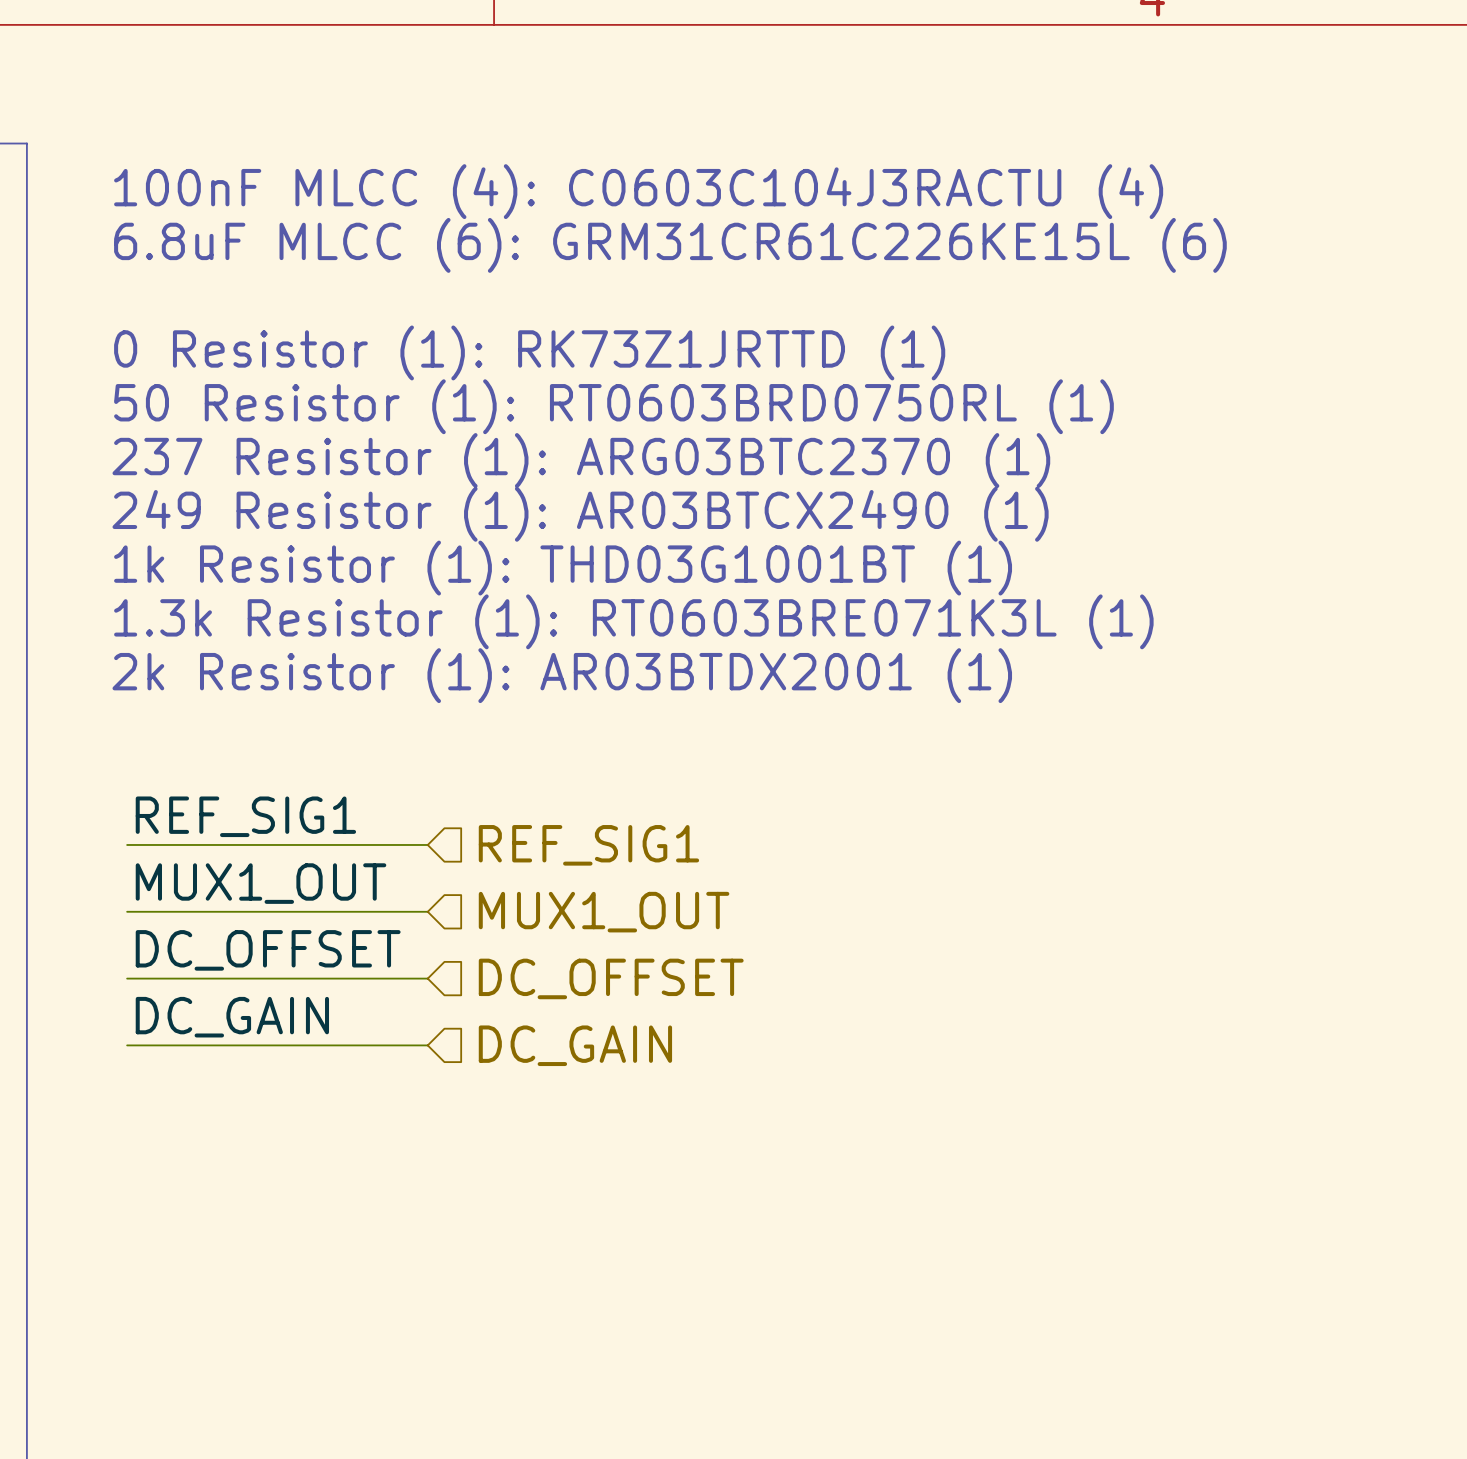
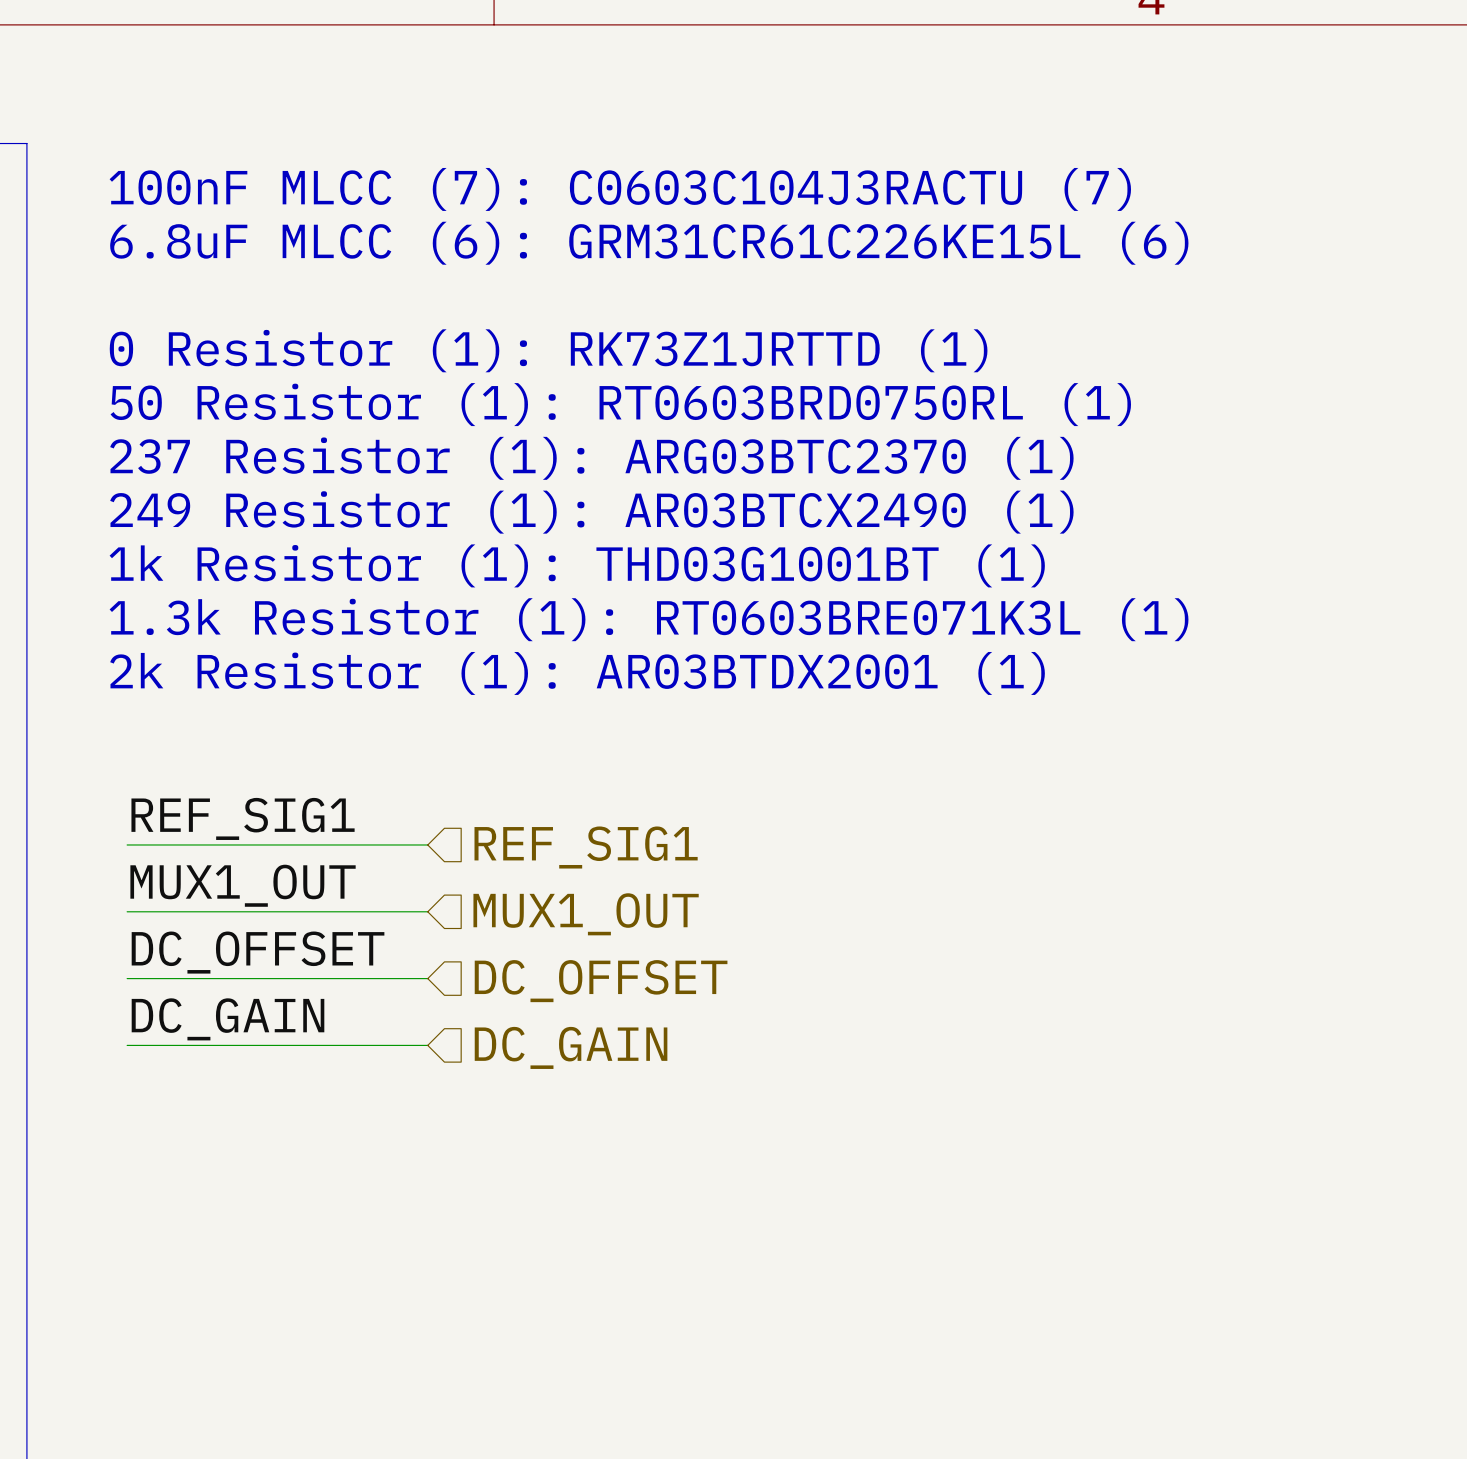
text: 100nF MLCC (4): C0603C104J3RACTU (4) (638, 191) -> 100nF MLCC (7): C0603C104J3RACTU (7) (620, 189)

